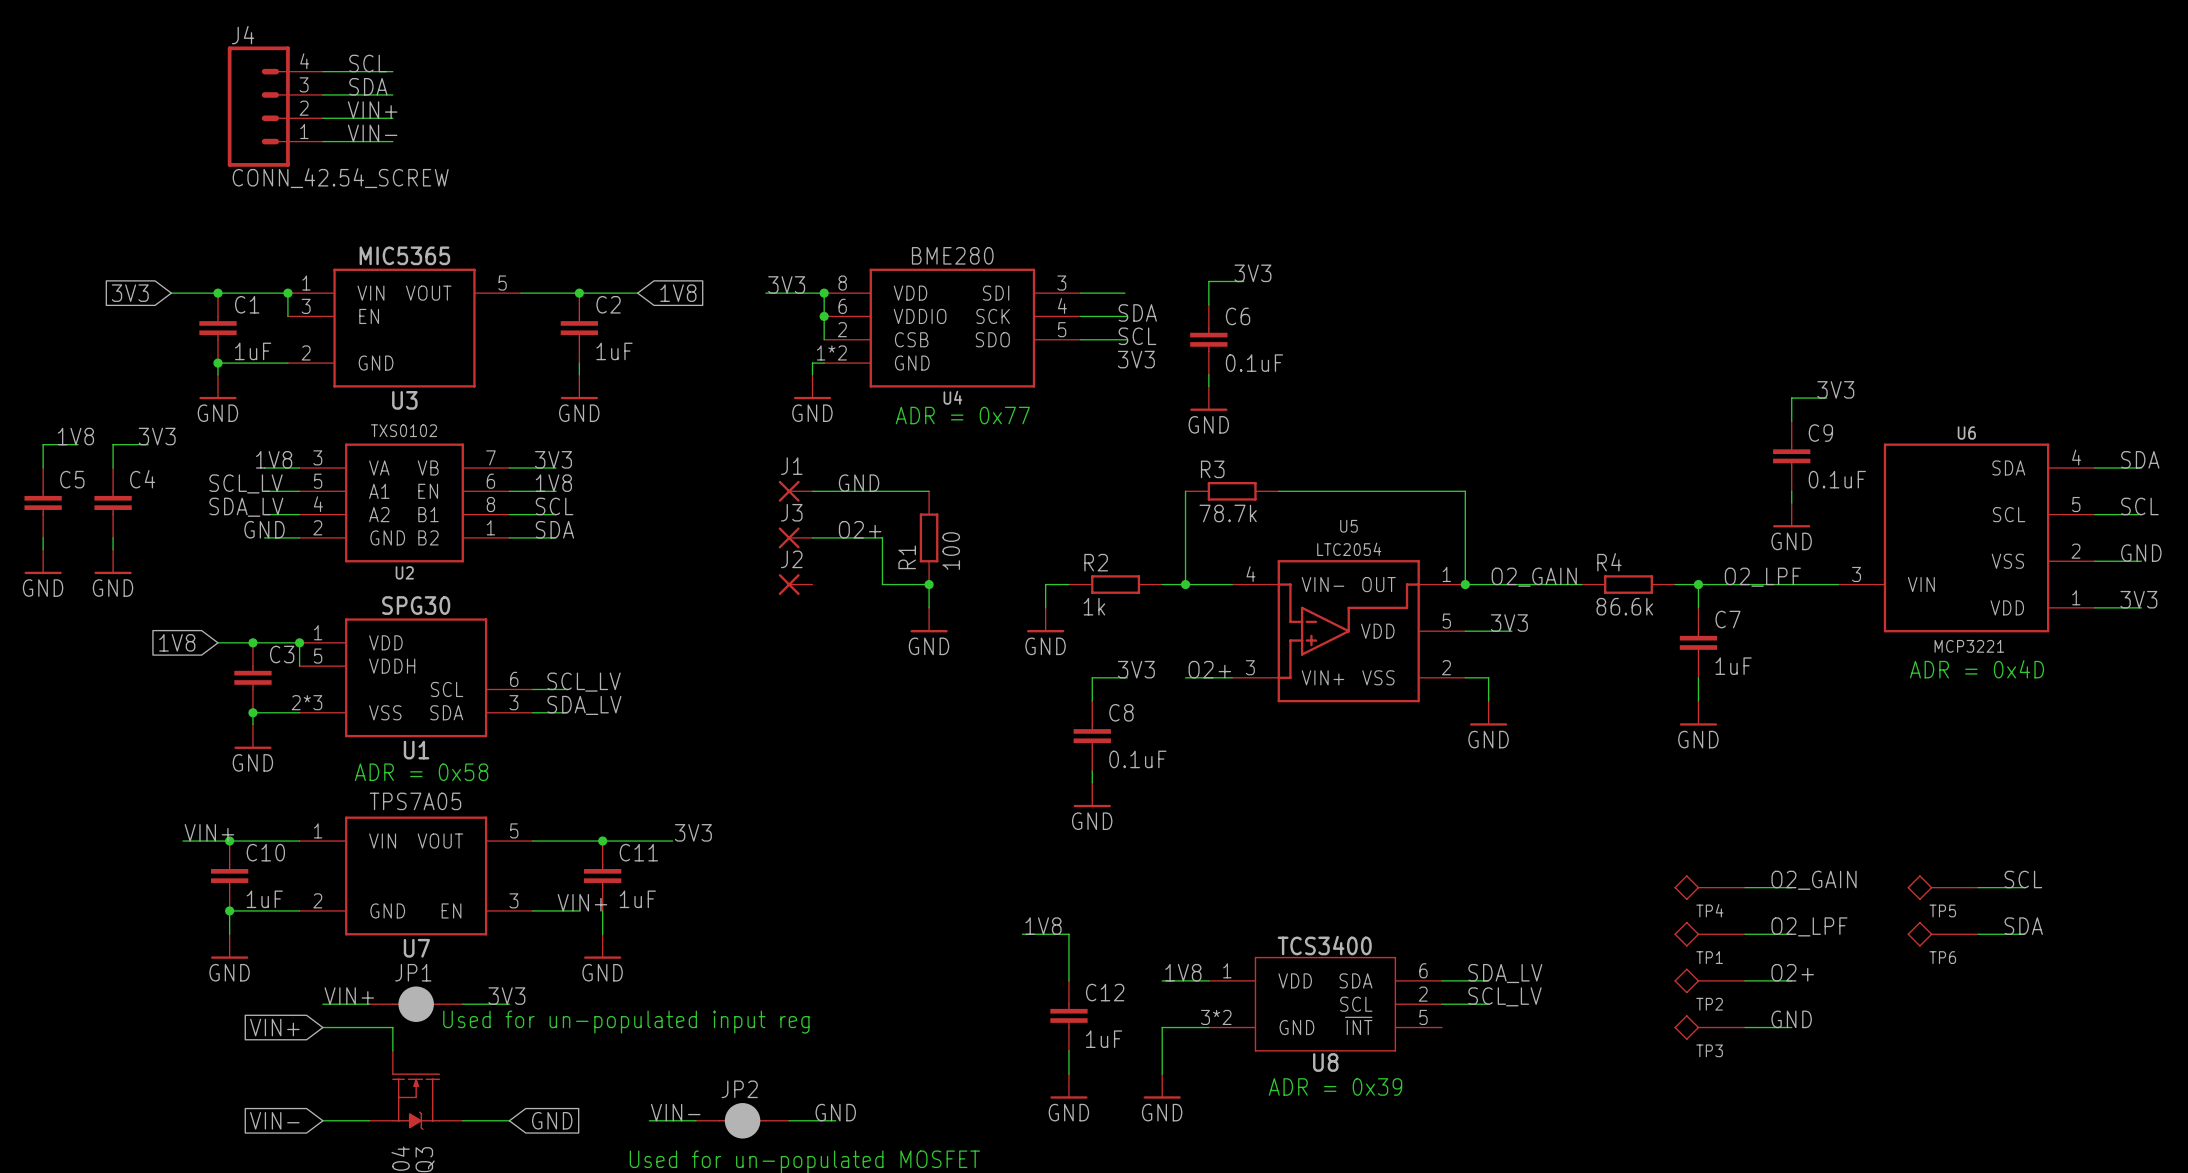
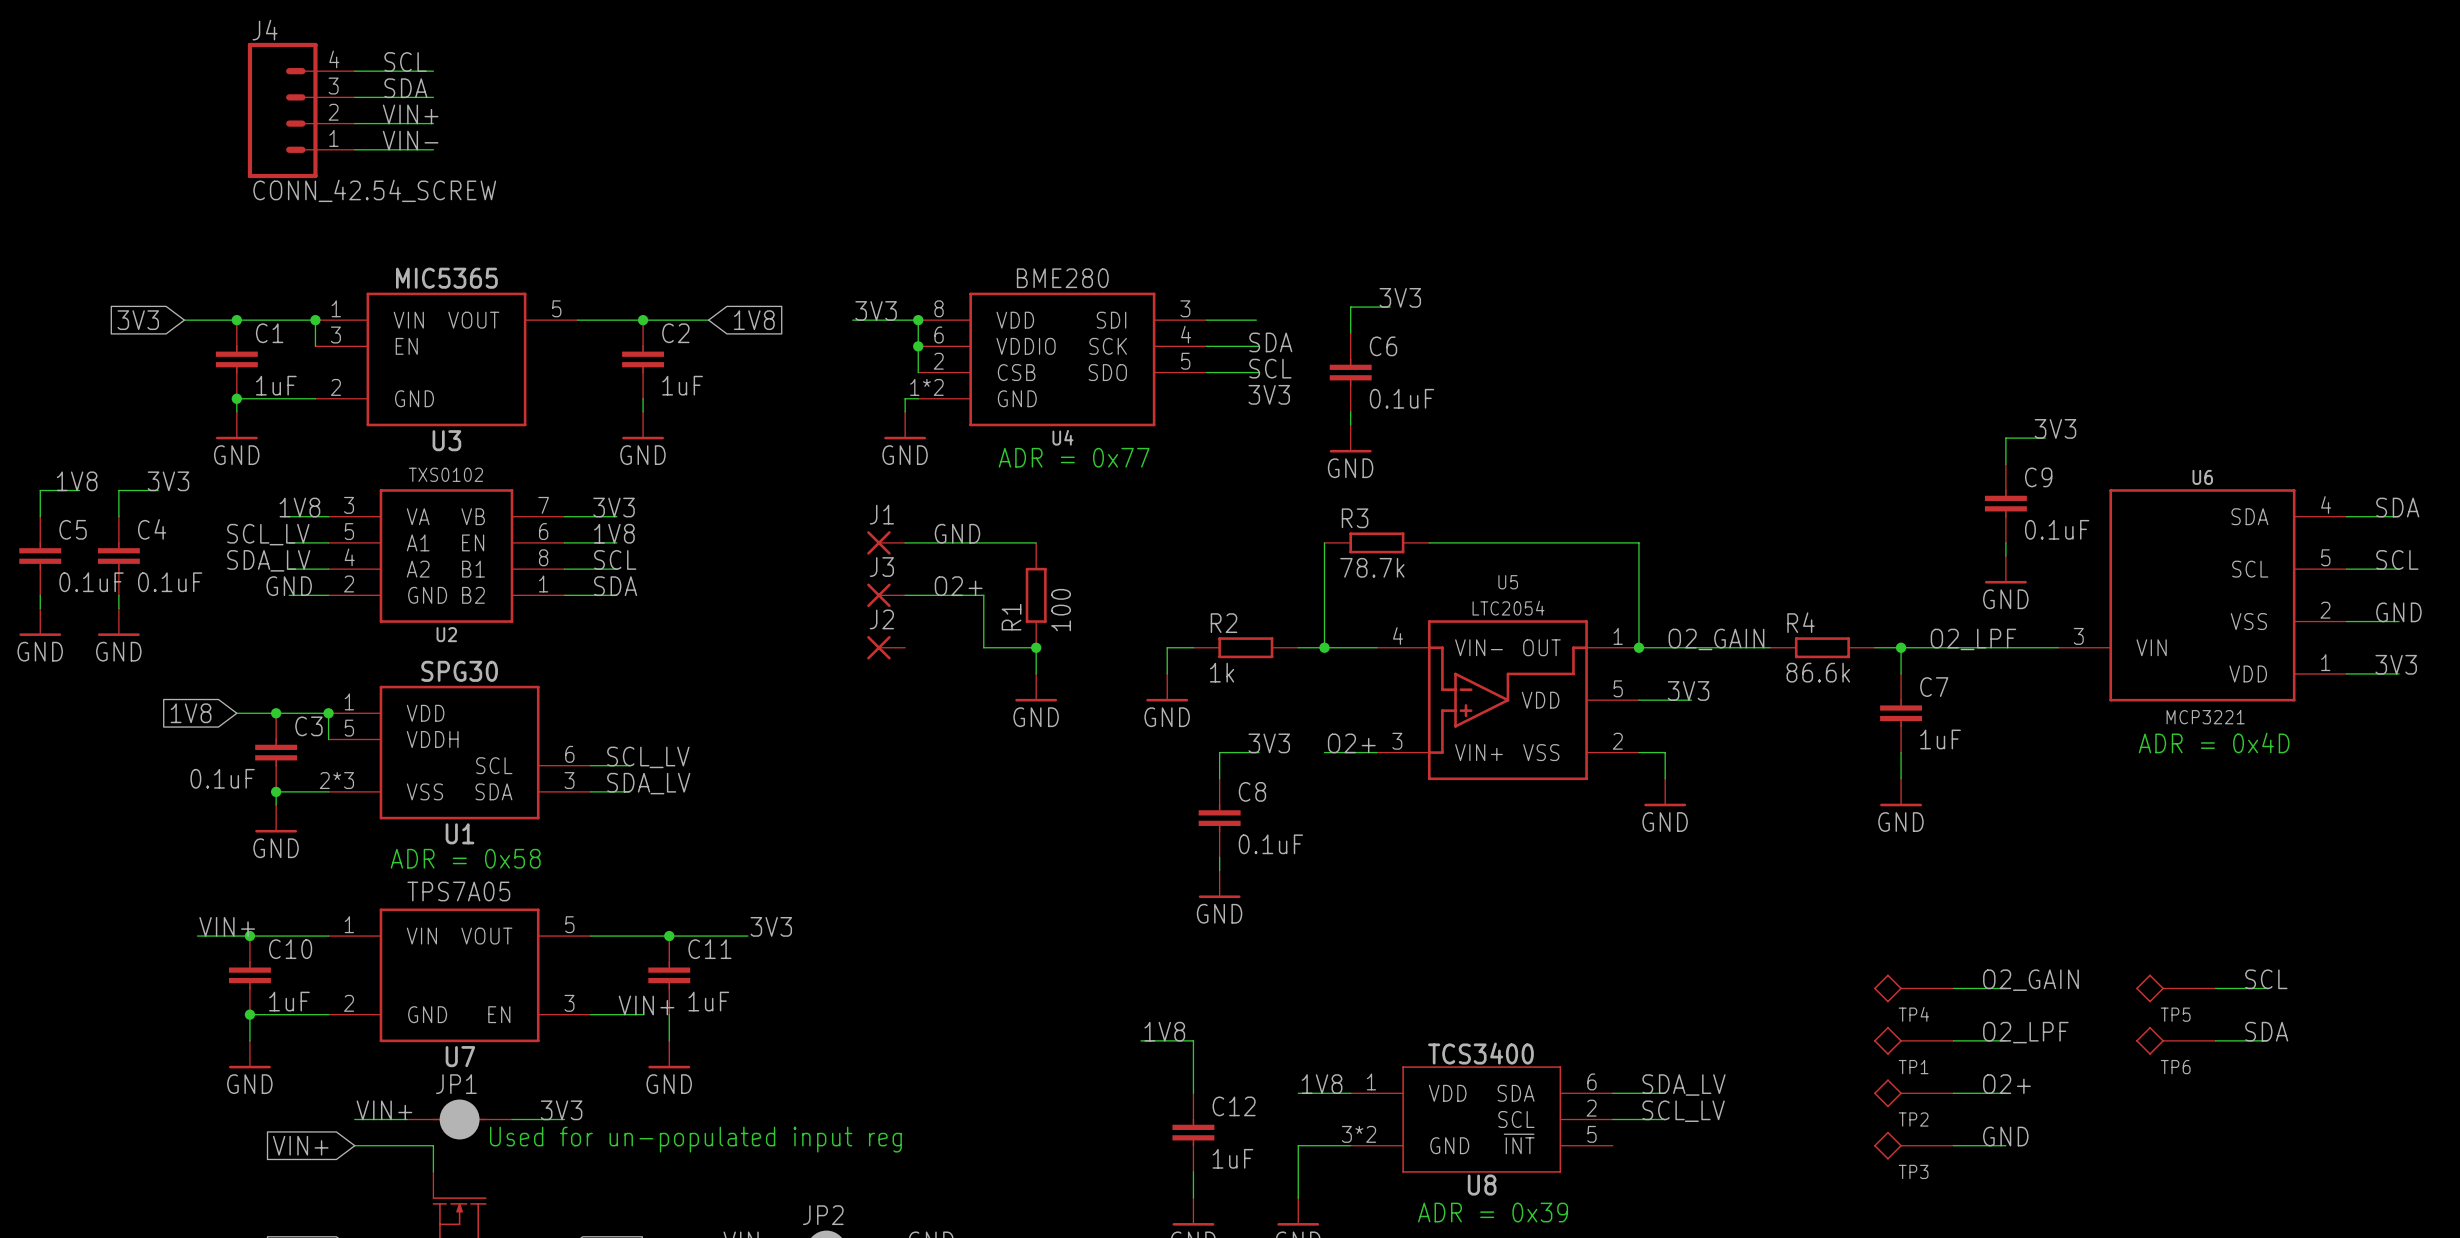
C5 value: none -> 0.1uF (91, 582)
C4 value: none -> 0.1uF (170, 582)
C3 value: none -> 0.1uF (222, 778)

